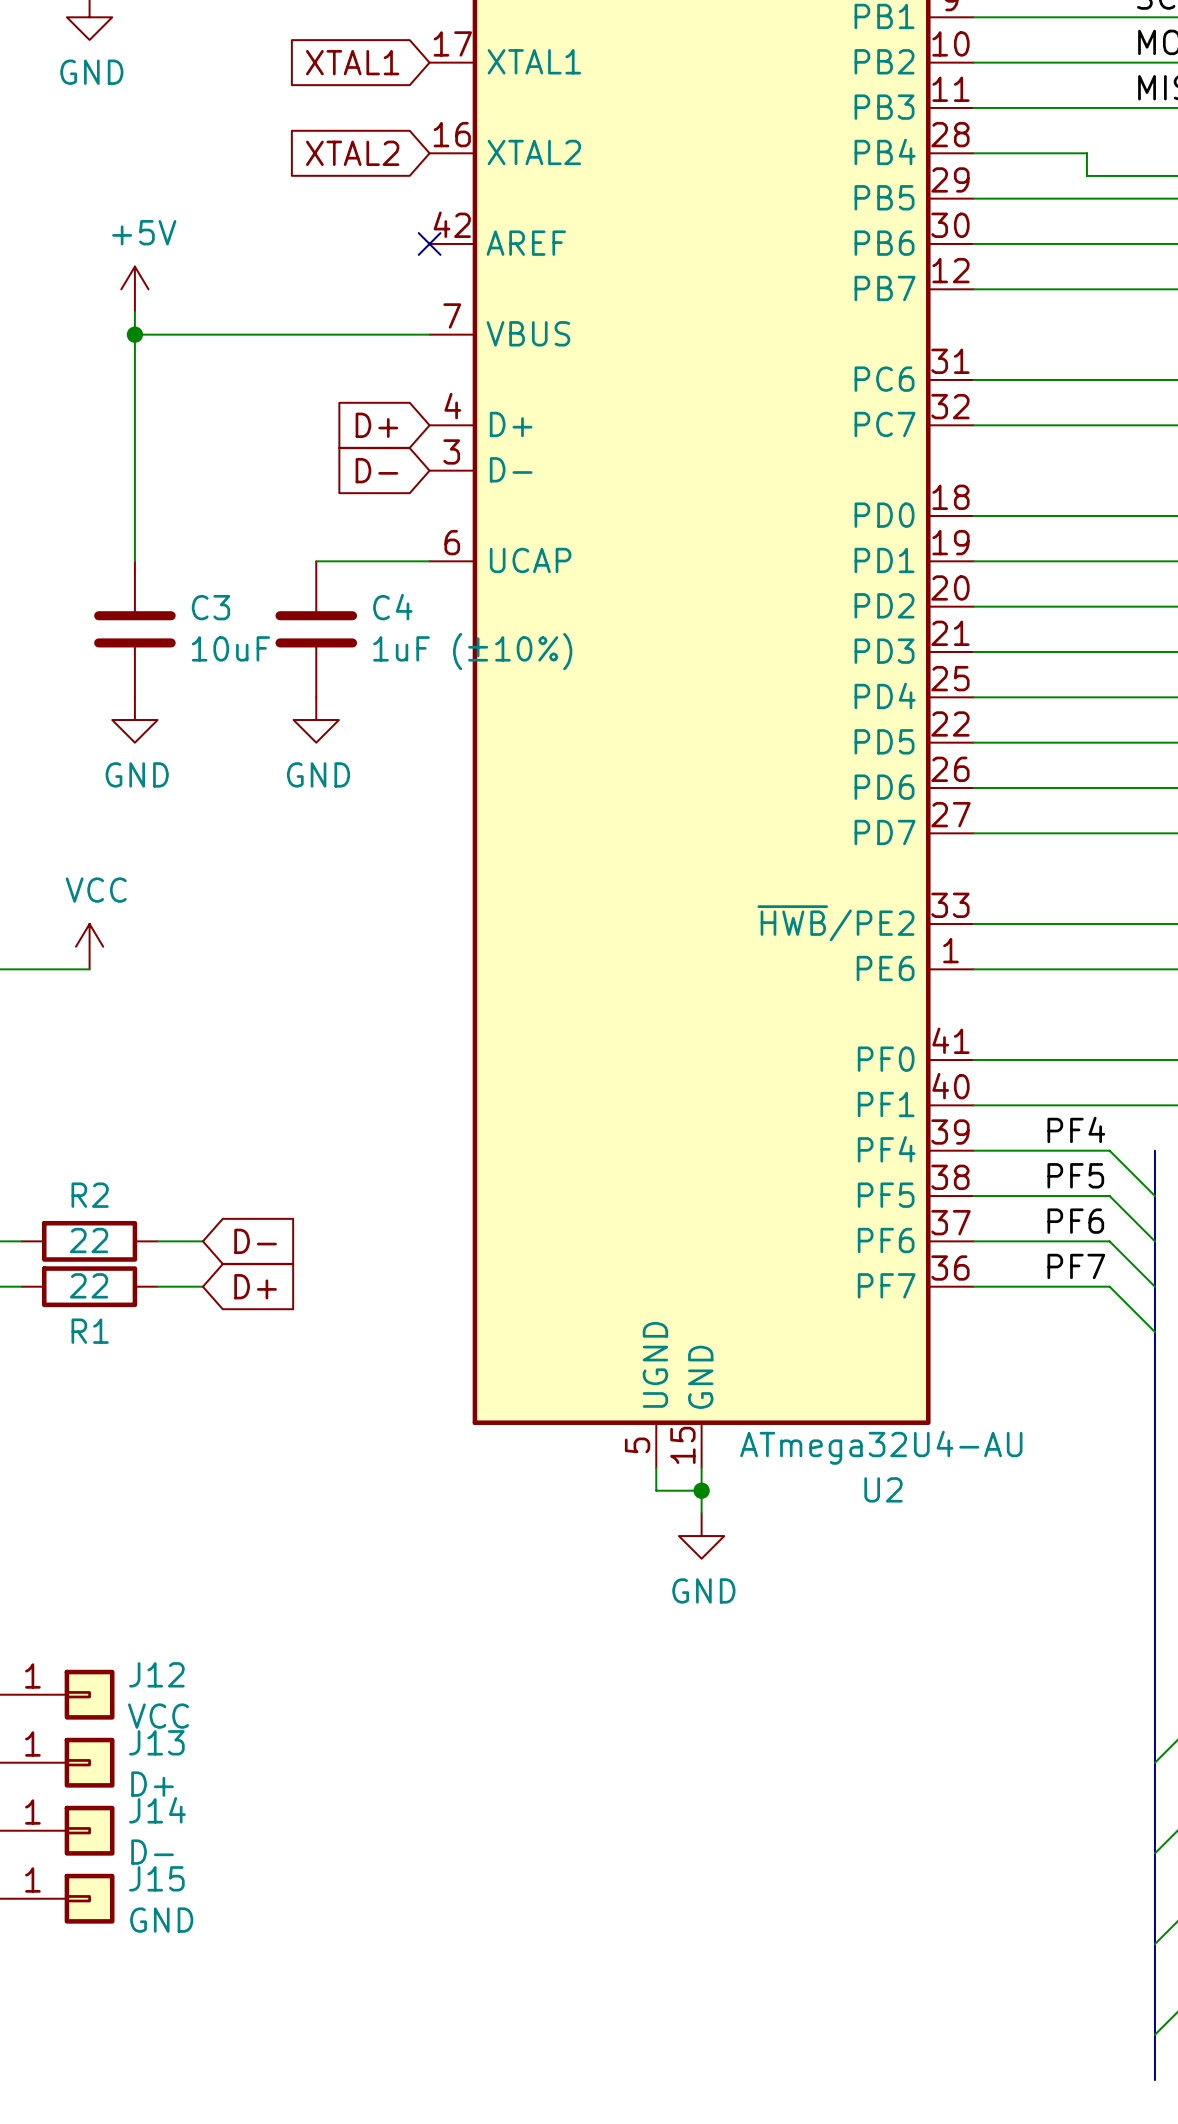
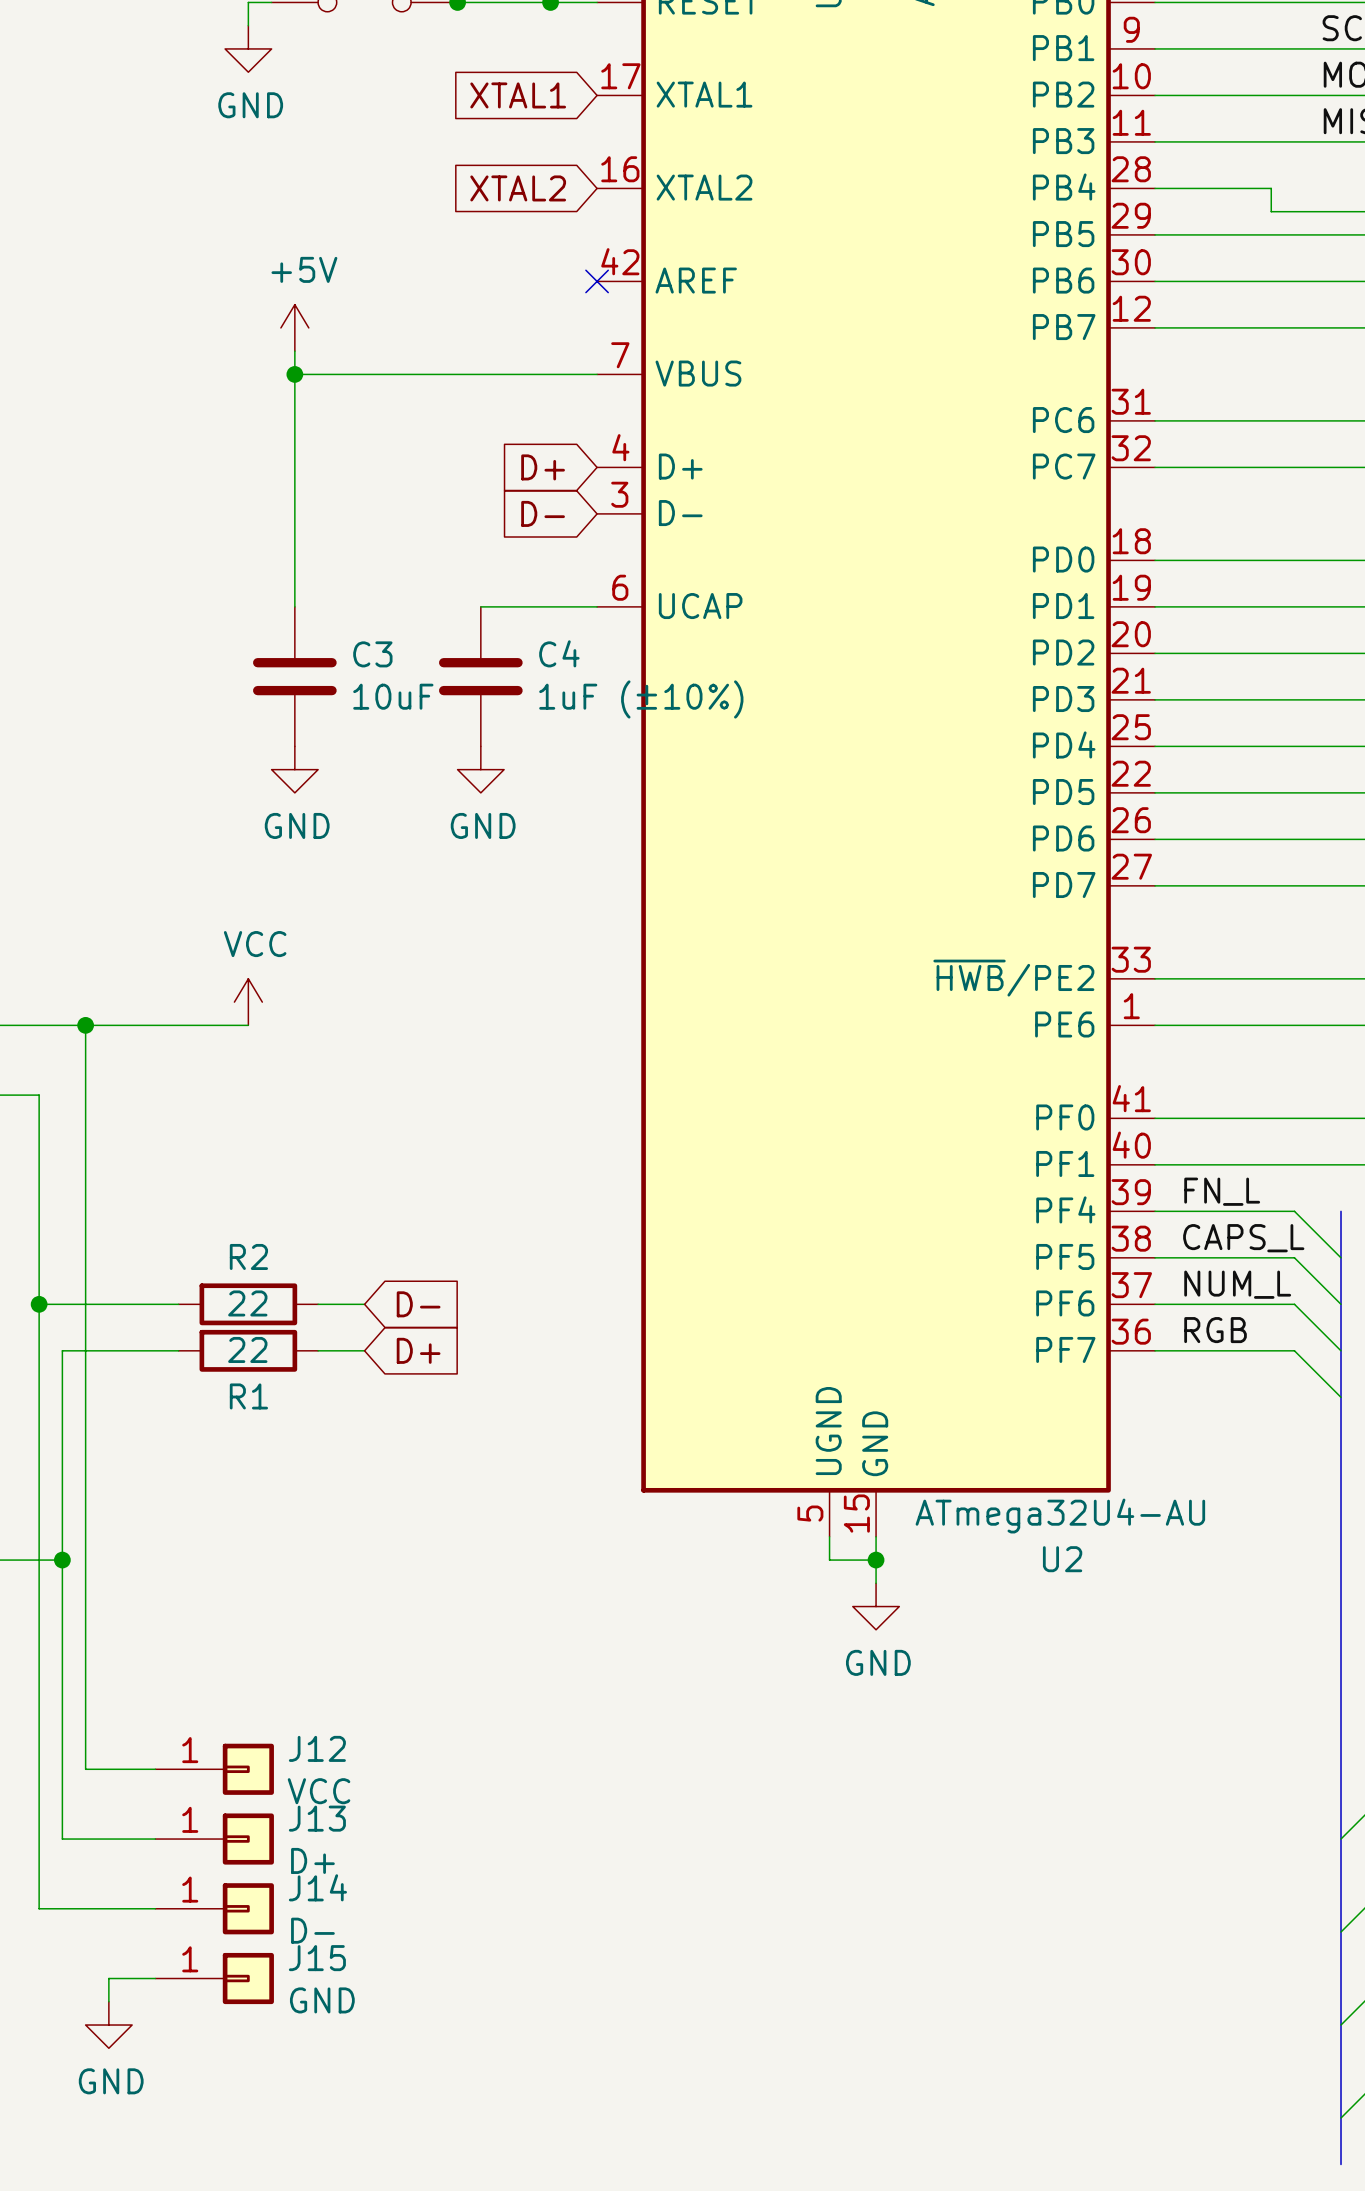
label: PF4 (1076, 1129) -> none
label: none -> FN_L (1222, 1191)
label: PF5 (1075, 1175) -> none
label: none -> CAPS_L (1243, 1238)
label: PF6 (1075, 1221) -> none
label: none -> NUM_L (1237, 1284)
label: none -> RGB (1215, 1330)
label: PF7 (1076, 1266) -> none

